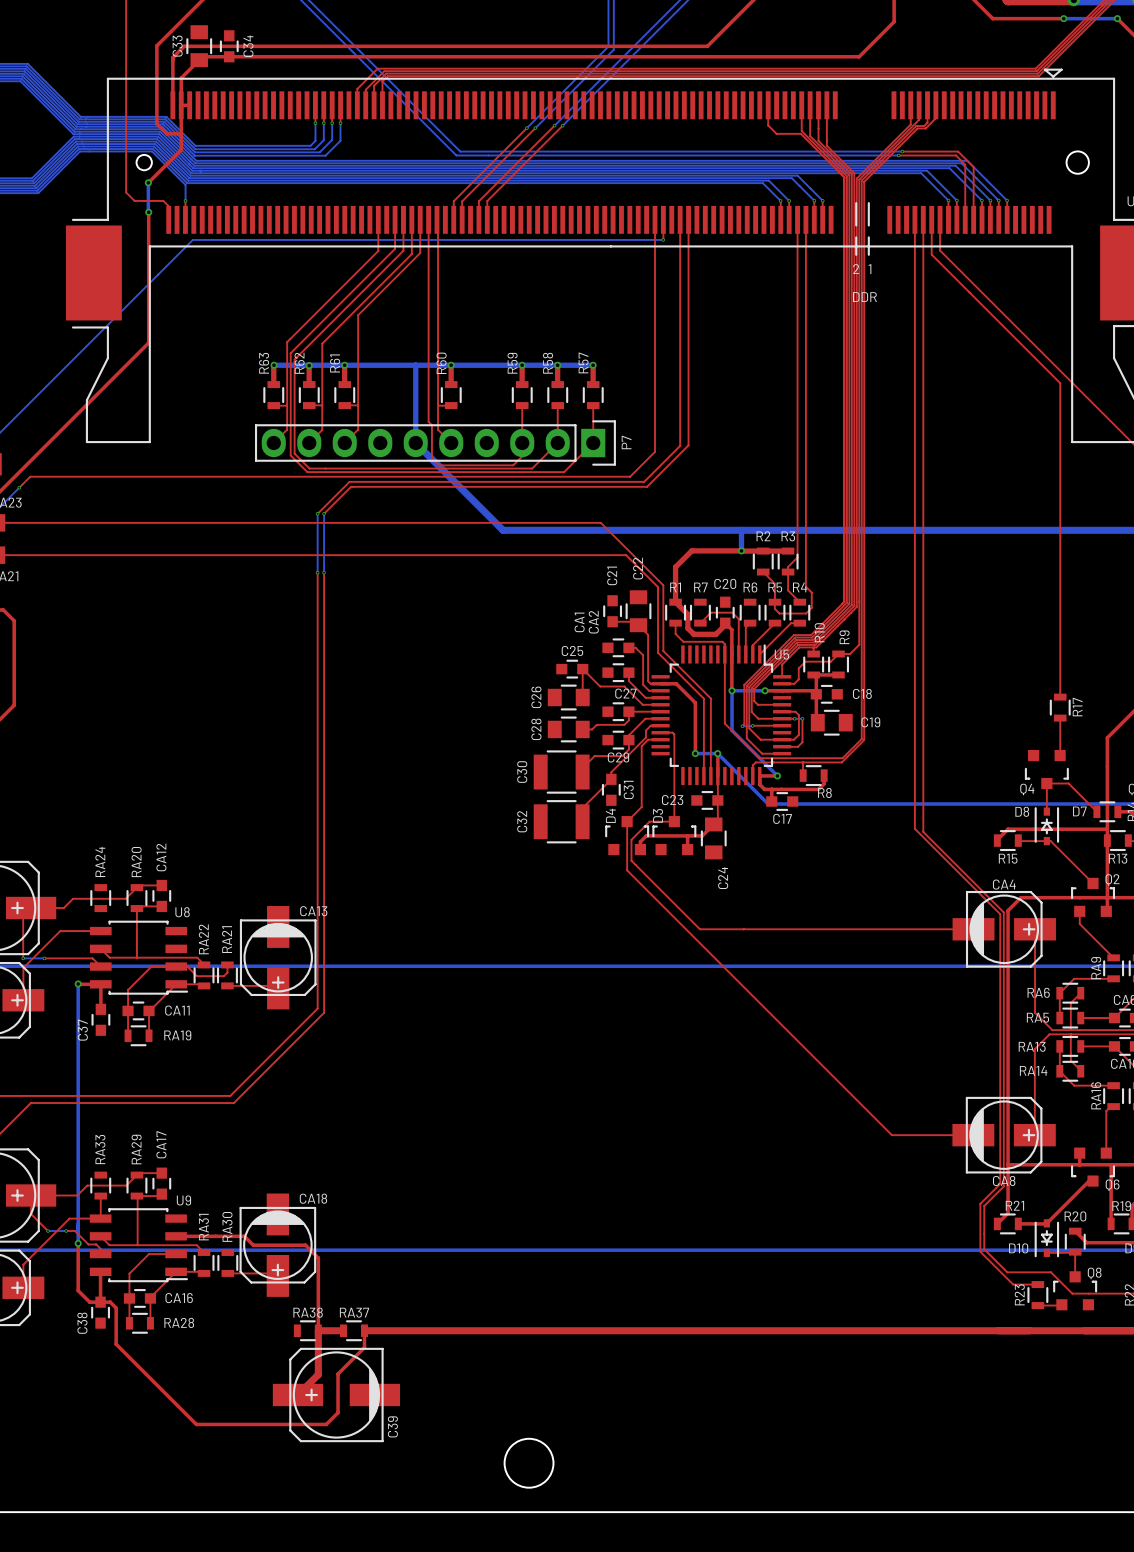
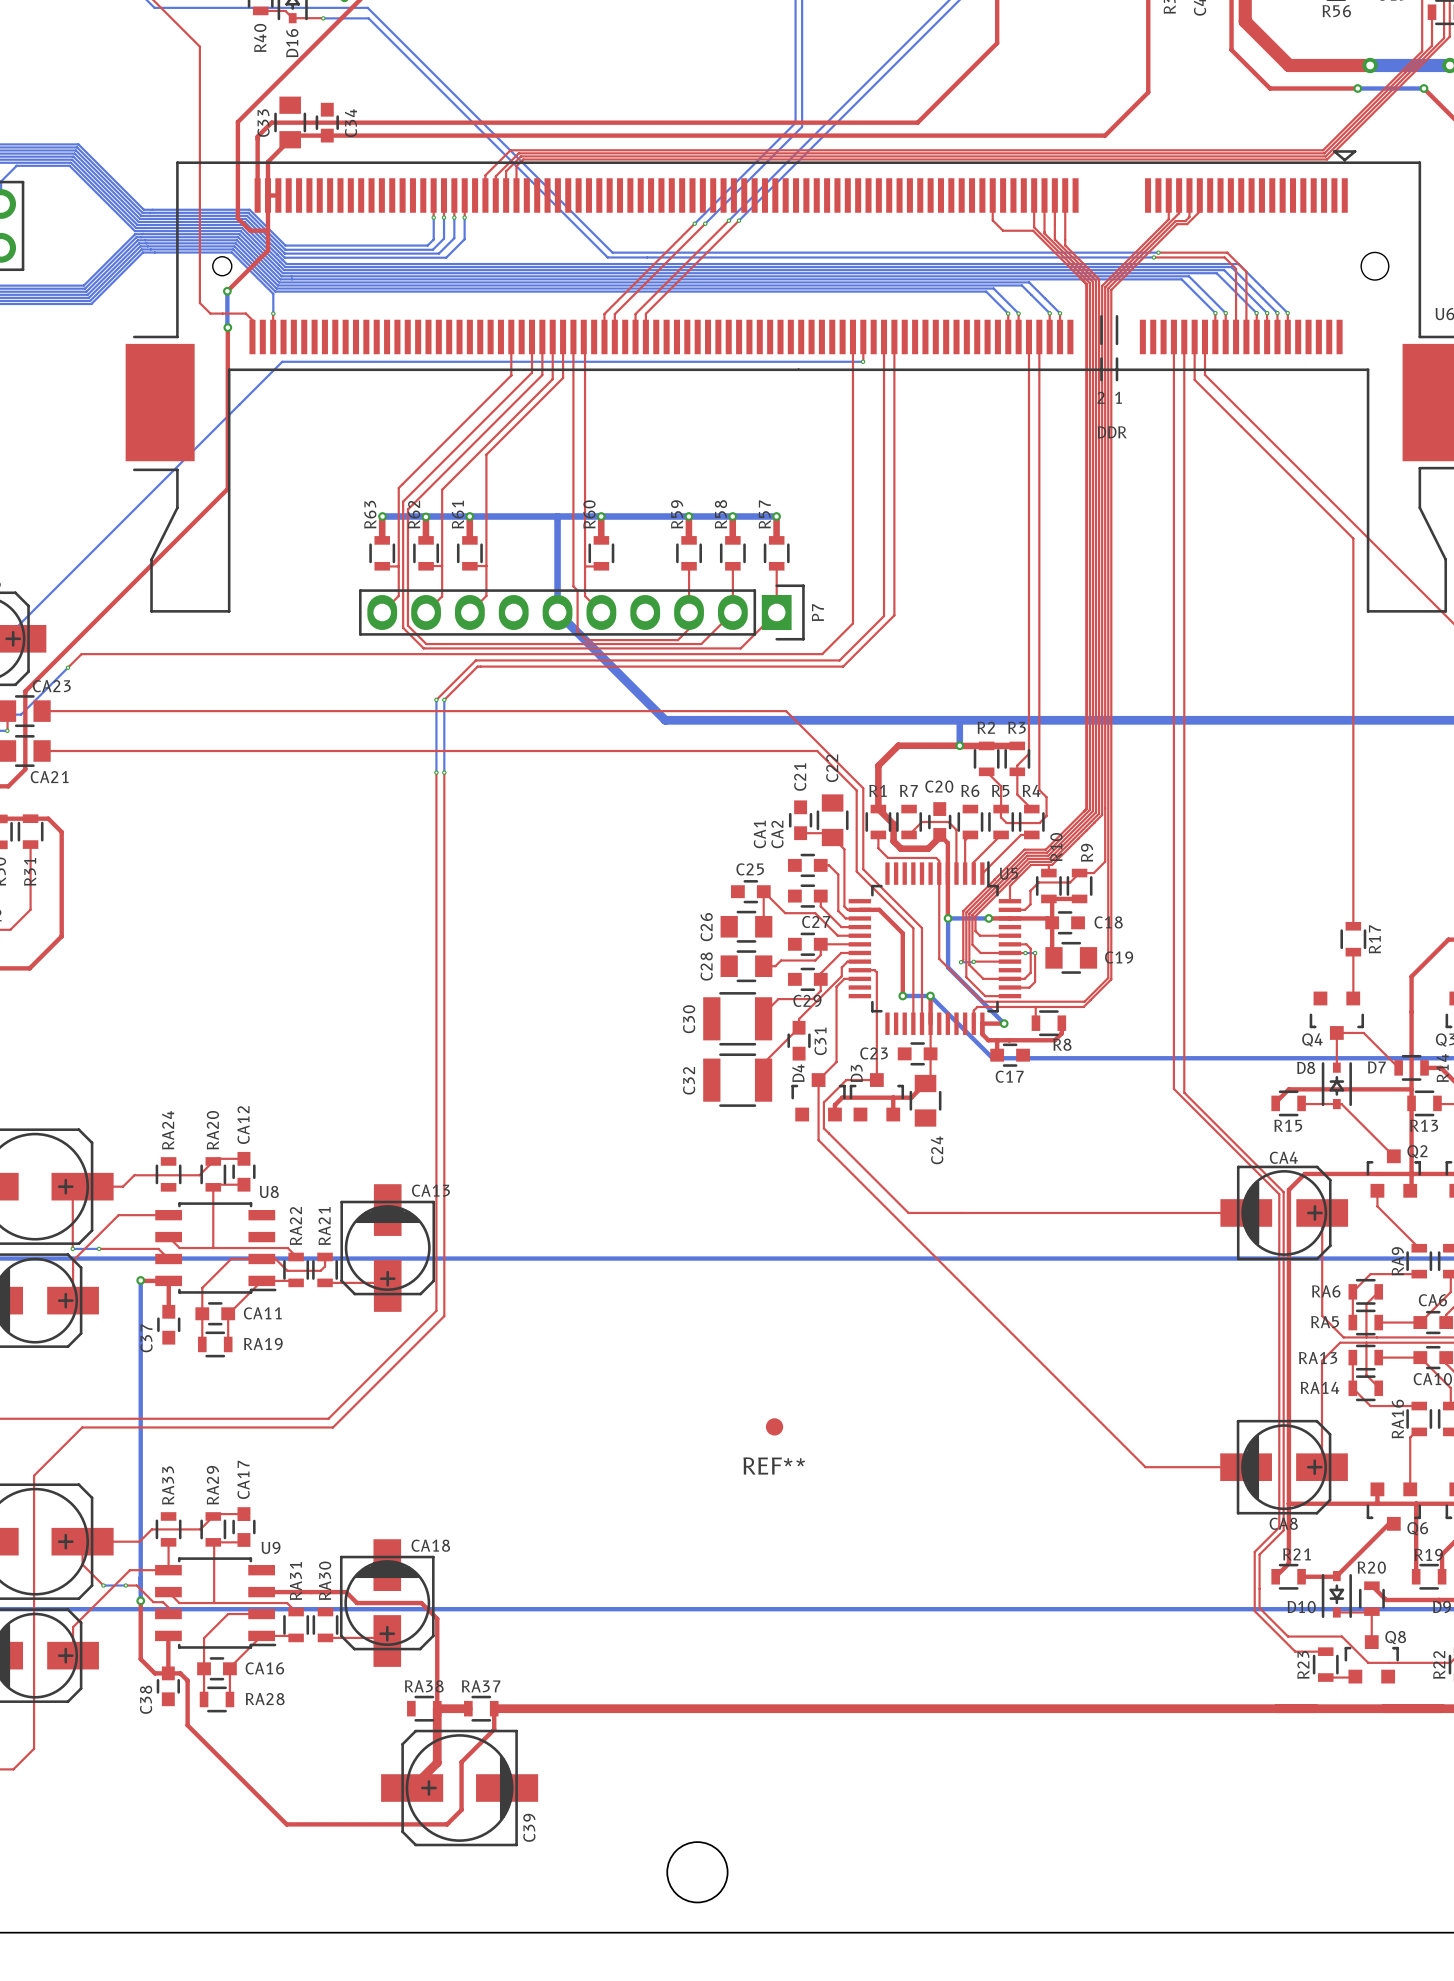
REF**: none -> (774, 1426)

